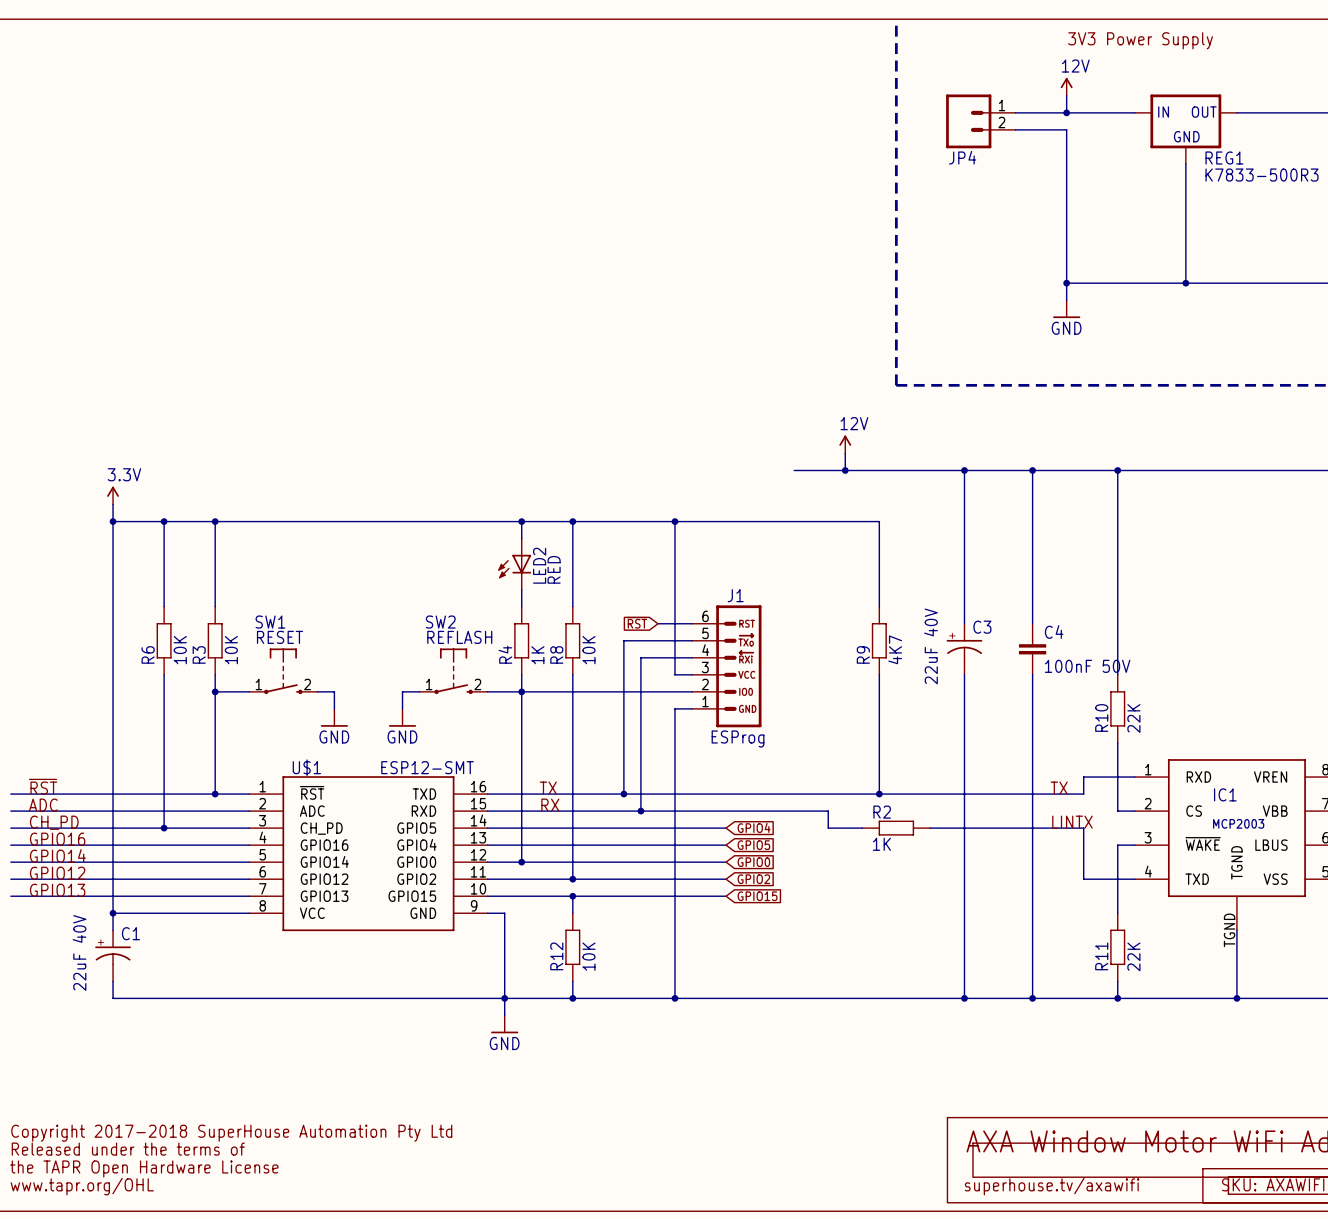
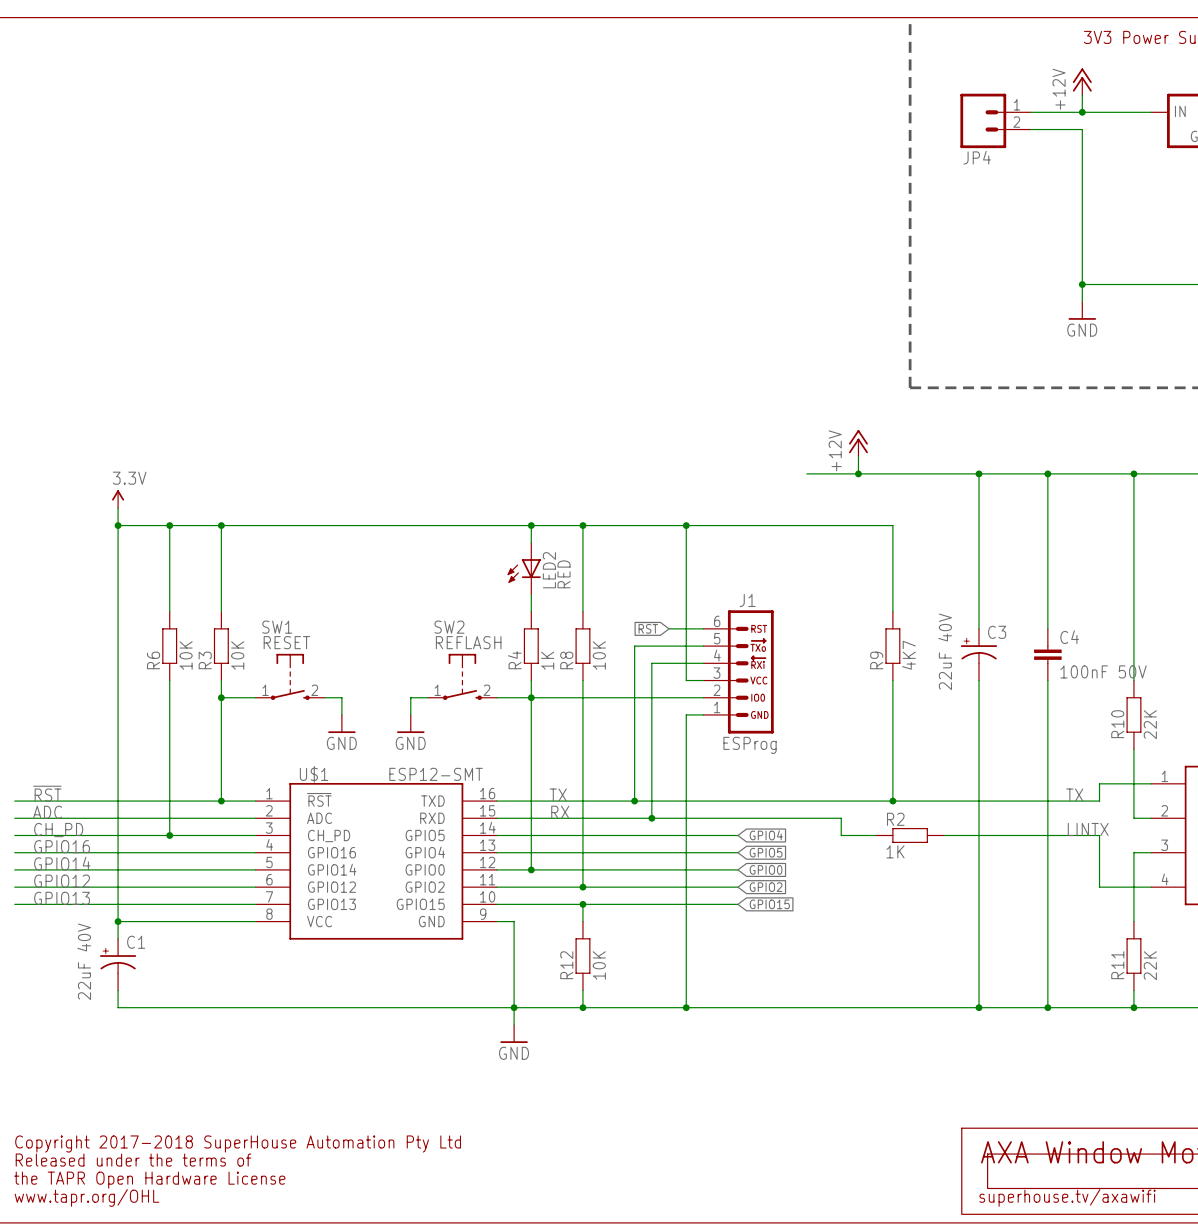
power symbol: 12V (1066, 86) -> +12V (1082, 81)
power symbol: 12V (845, 444) -> +12V (858, 443)

